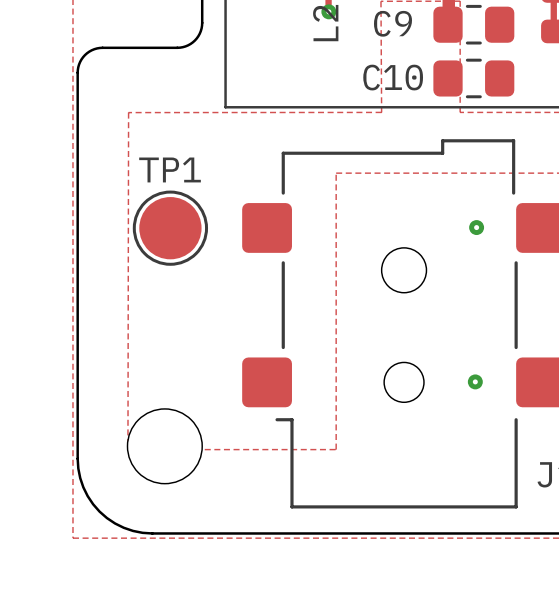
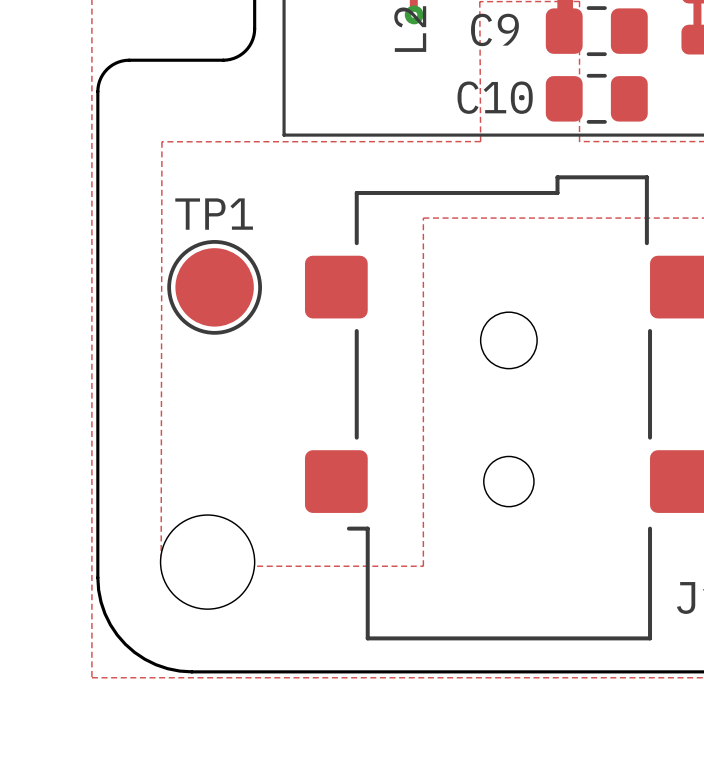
via: (476, 227) -> none
via: (475, 381) -> none

